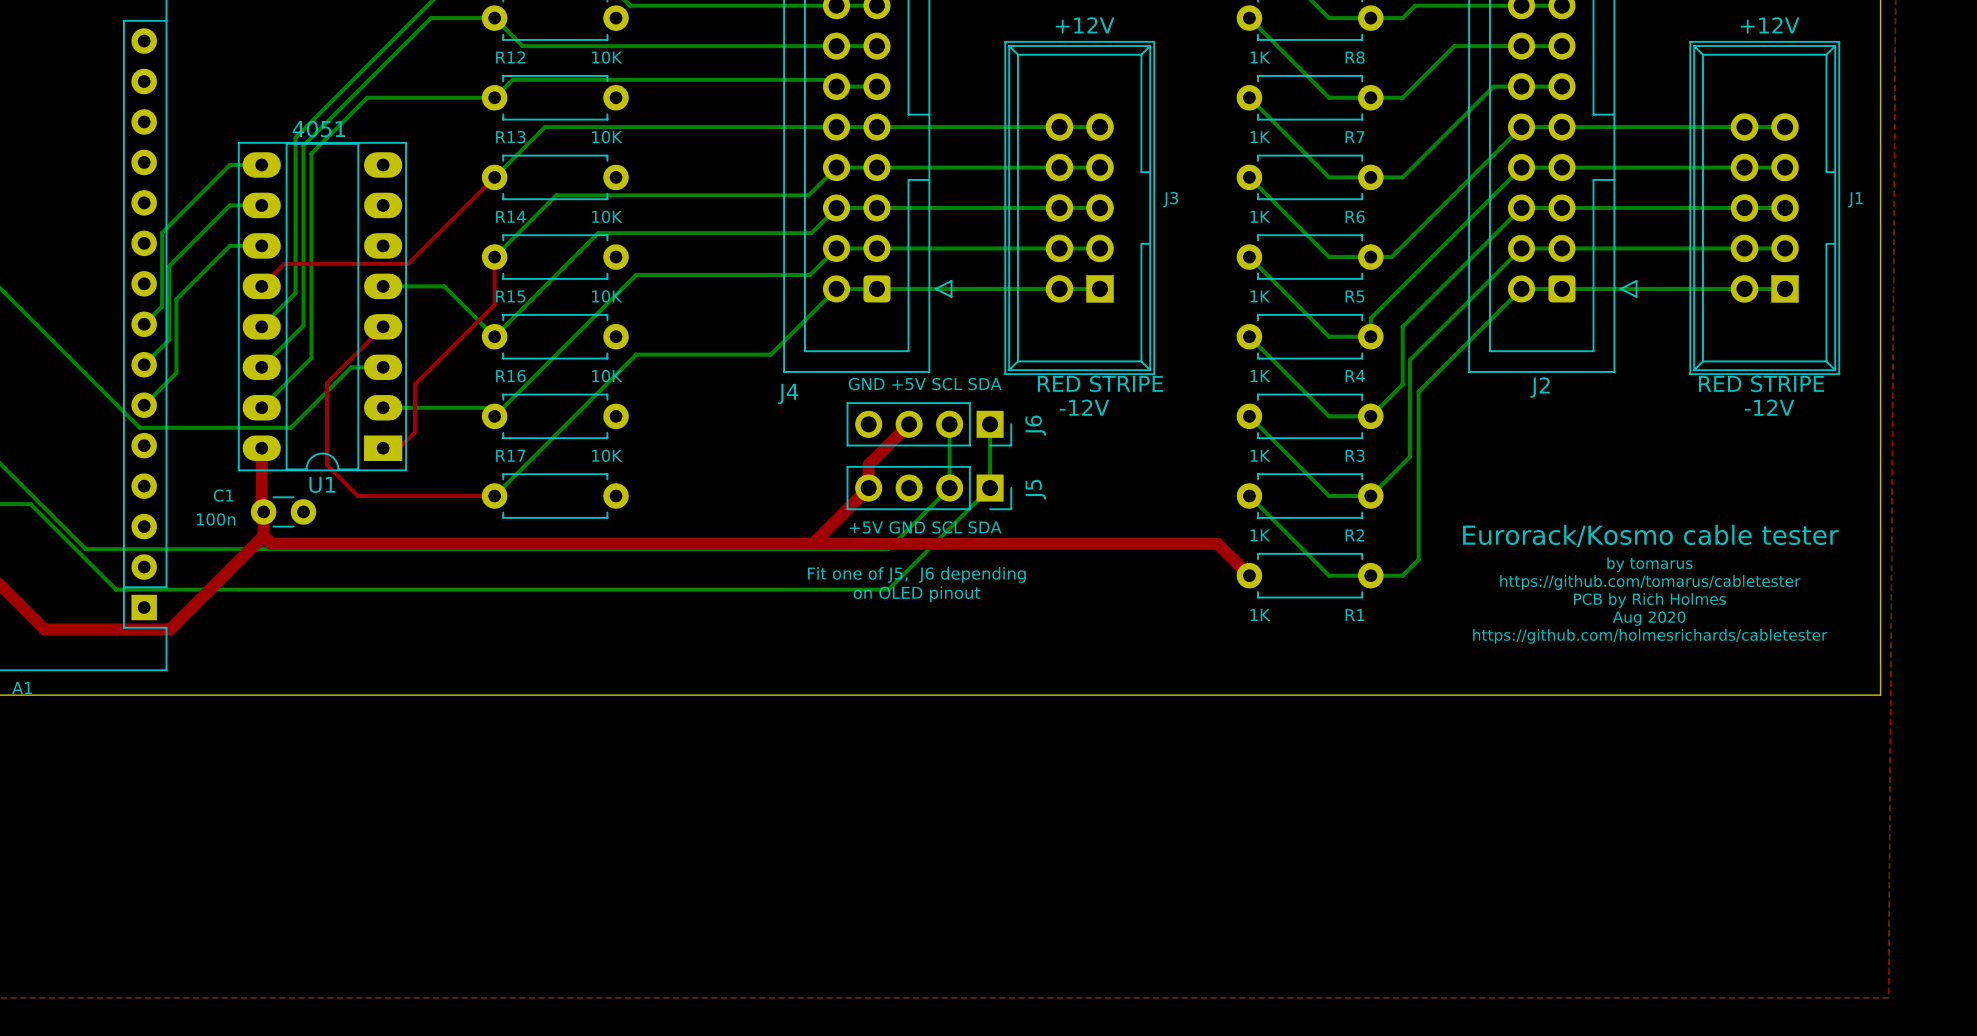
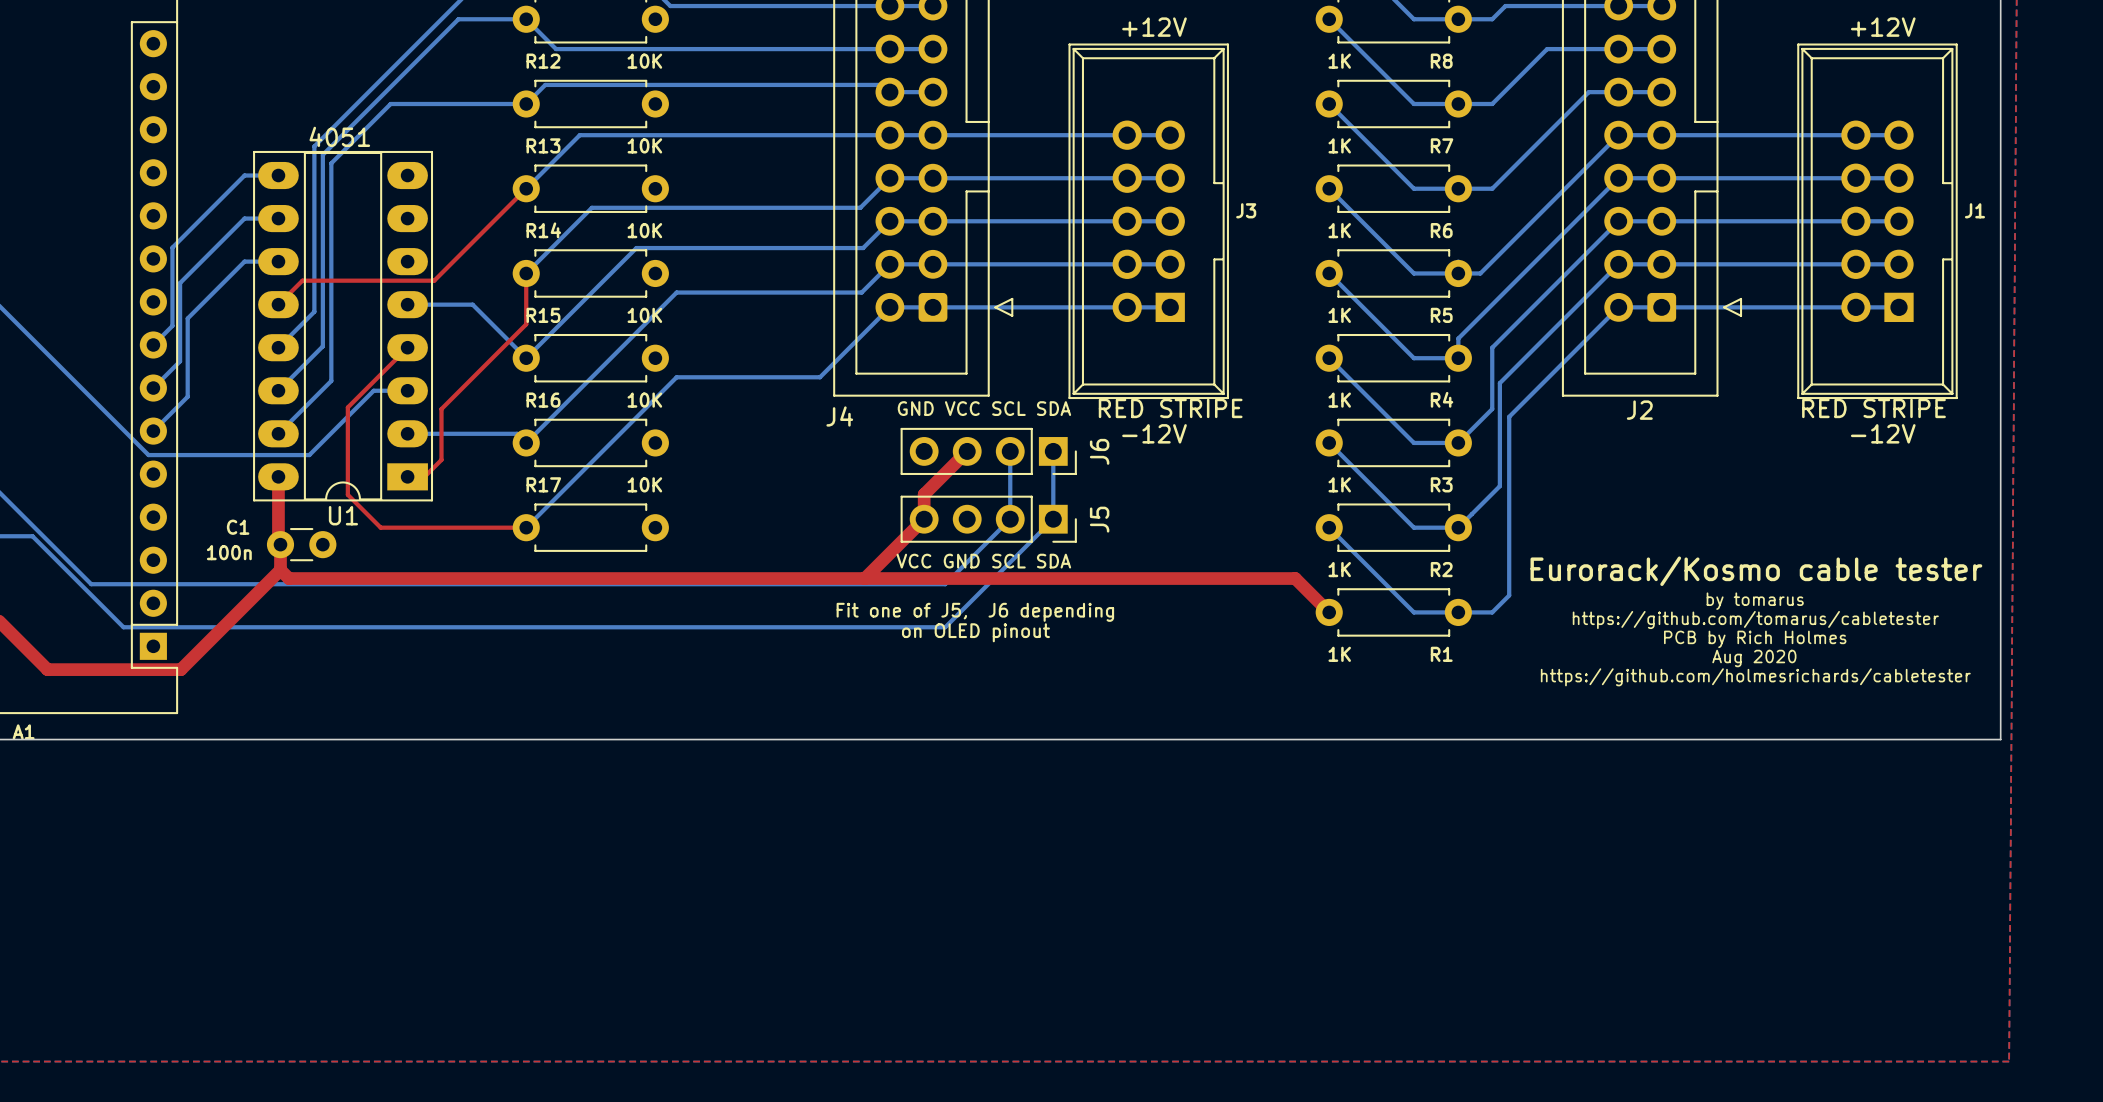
text: GND +5V SCL SDA (925, 384) -> GND VCC SCL SDA (984, 408)
text: +5V GND SCL SDA (925, 527) -> VCC GND SCL SDA (983, 561)

